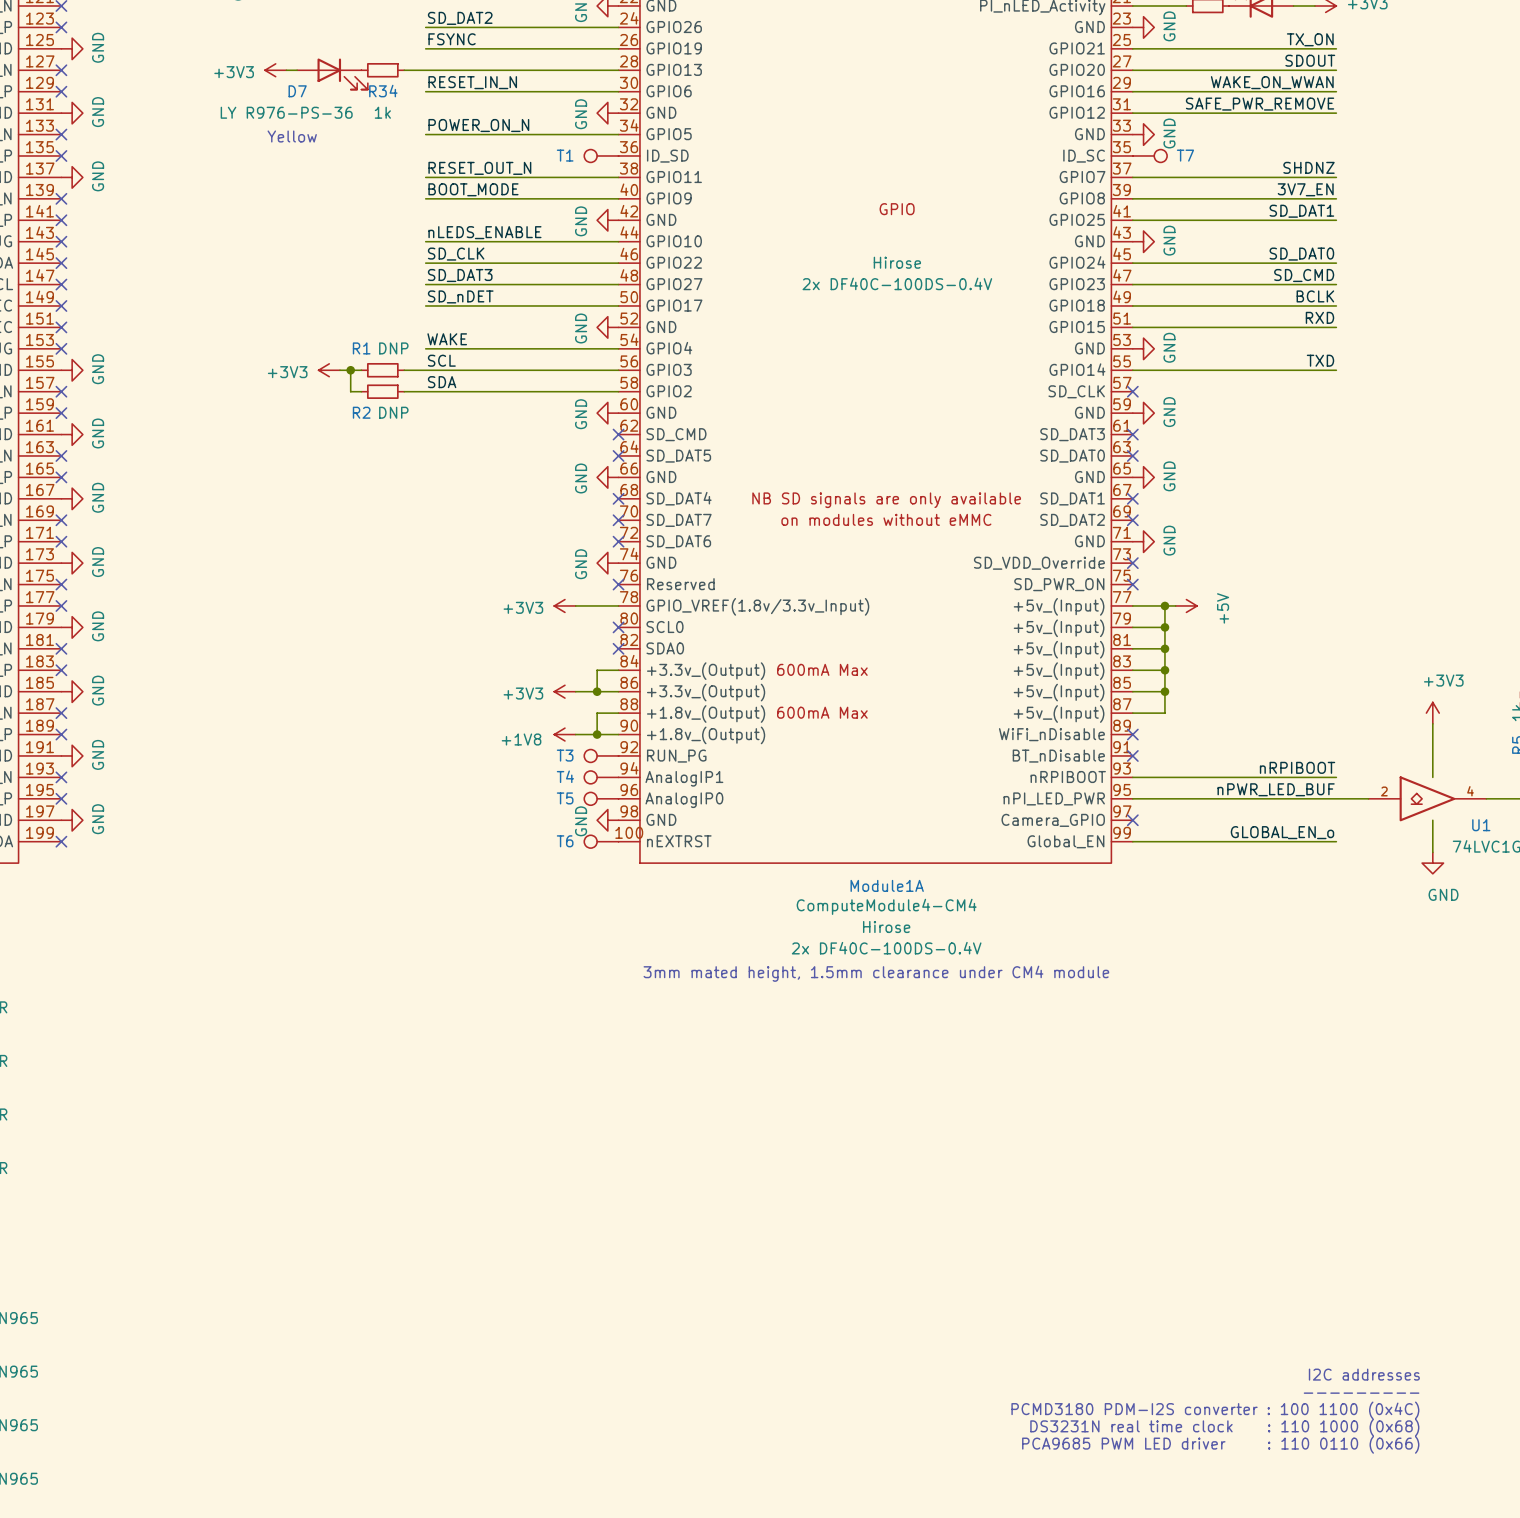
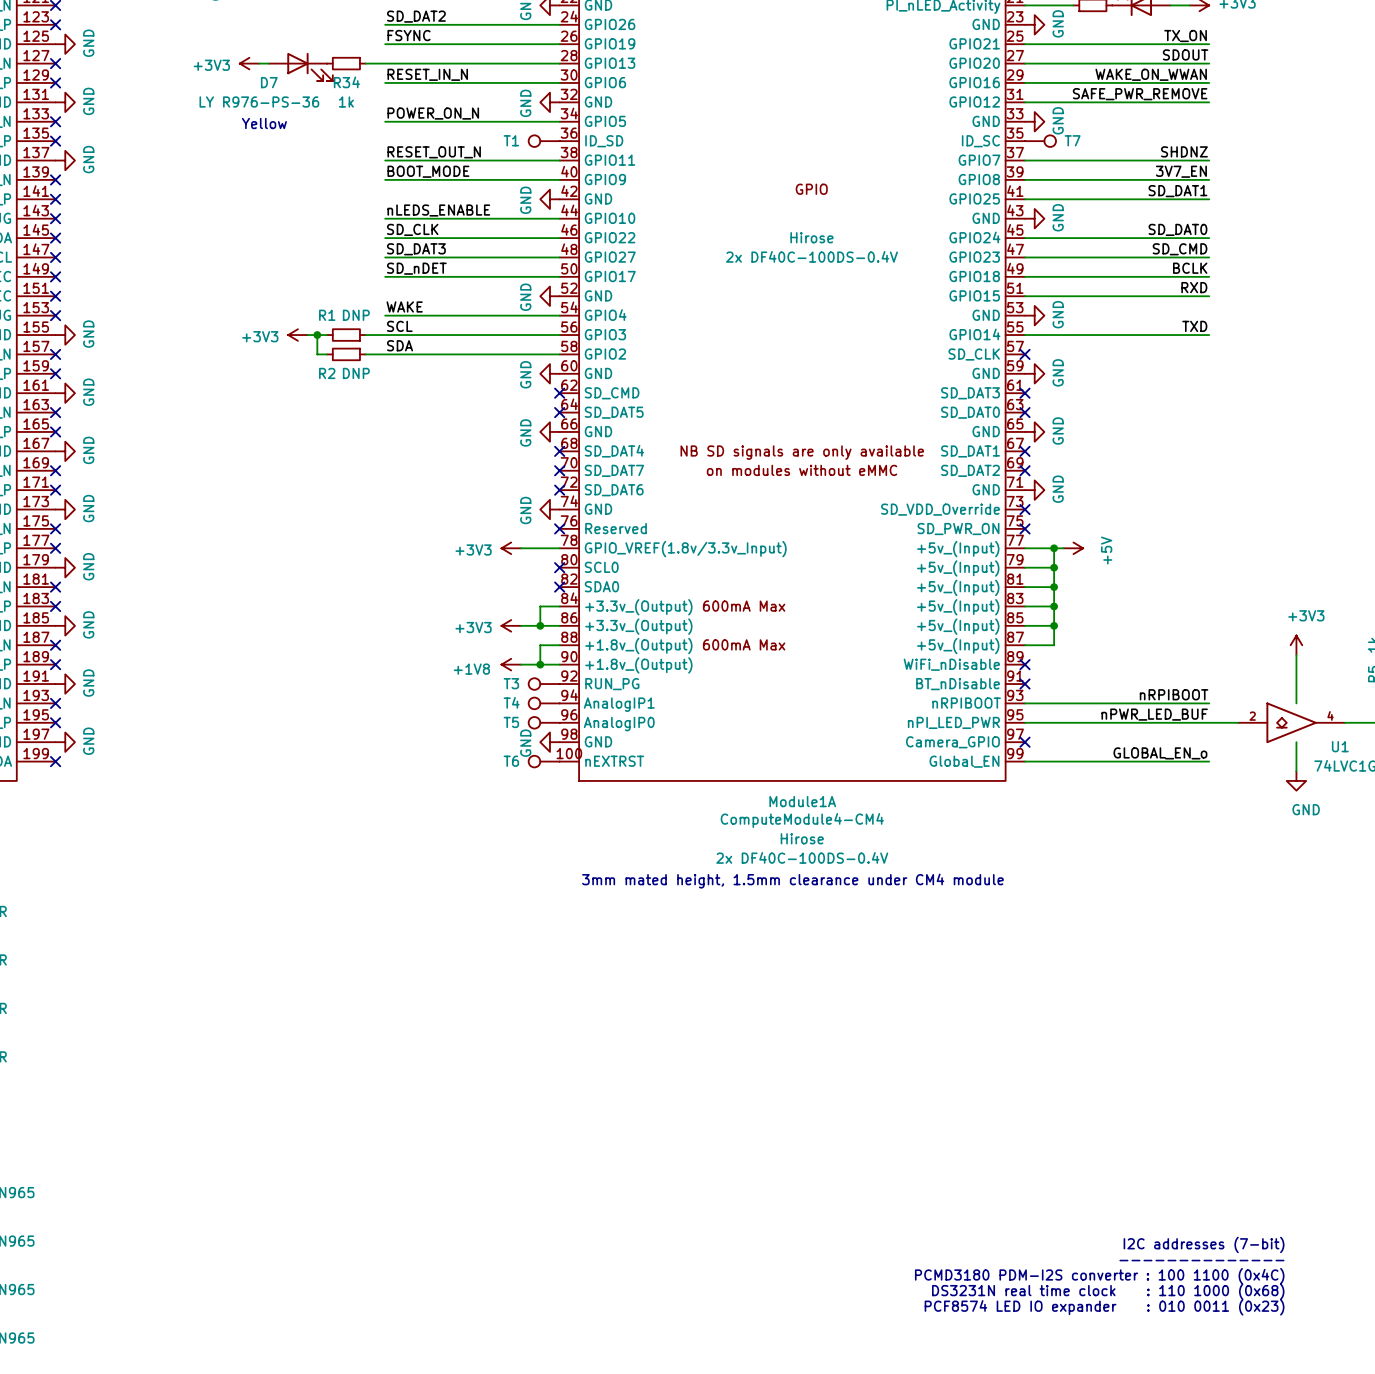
text: I2C addresses (1364, 1374) -> I2C addresses (7-bit) (1204, 1244)
text: --------- (1361, 1393) -> -------------- (1201, 1260)
text: PCA9685 PWM LED driver : 110 0110 (0x66) (1220, 1444) -> PCF8574 LED IO expander : 010 0011 (0x23) (1104, 1307)

